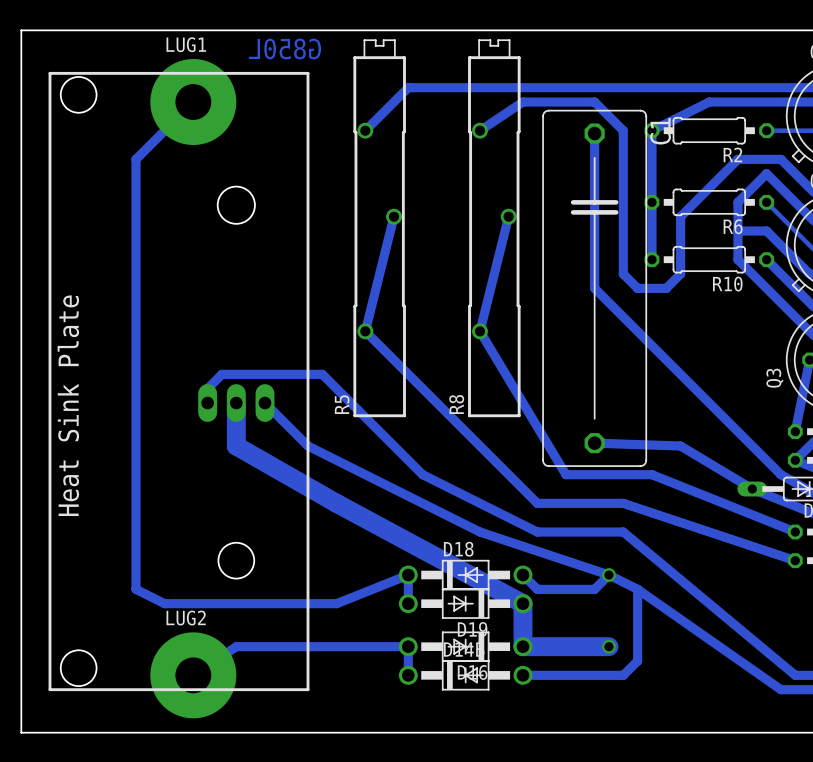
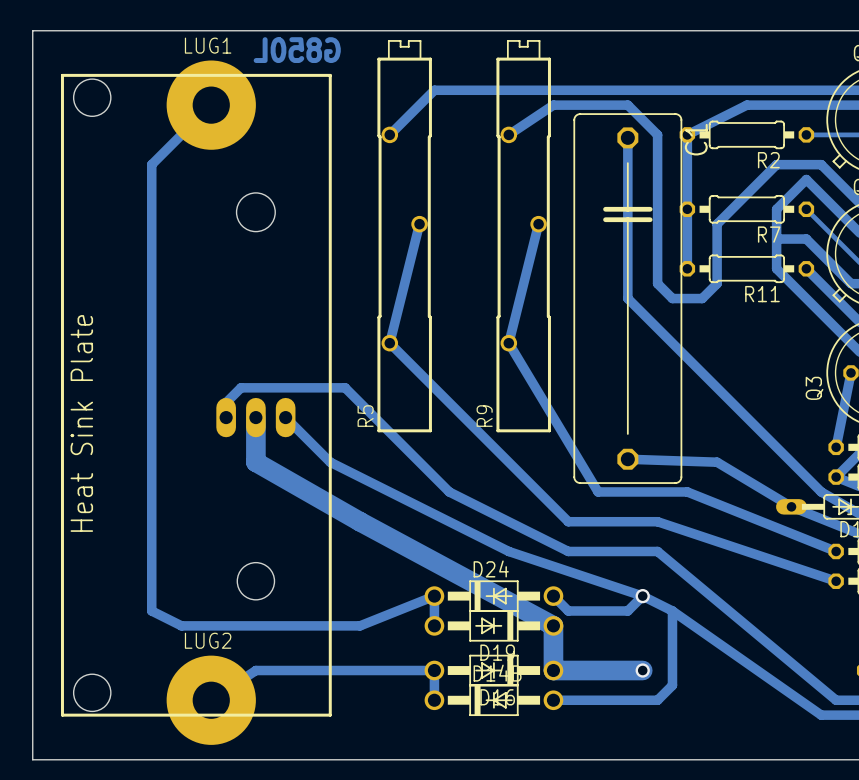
R6 name: R6 (733, 226) -> R7 (769, 234)
R10 name: R10 (727, 284) -> R11 (762, 294)
R8 name: R8 (456, 404) -> R9 (484, 416)
D18 name: D18 (458, 549) -> D24 (491, 568)

